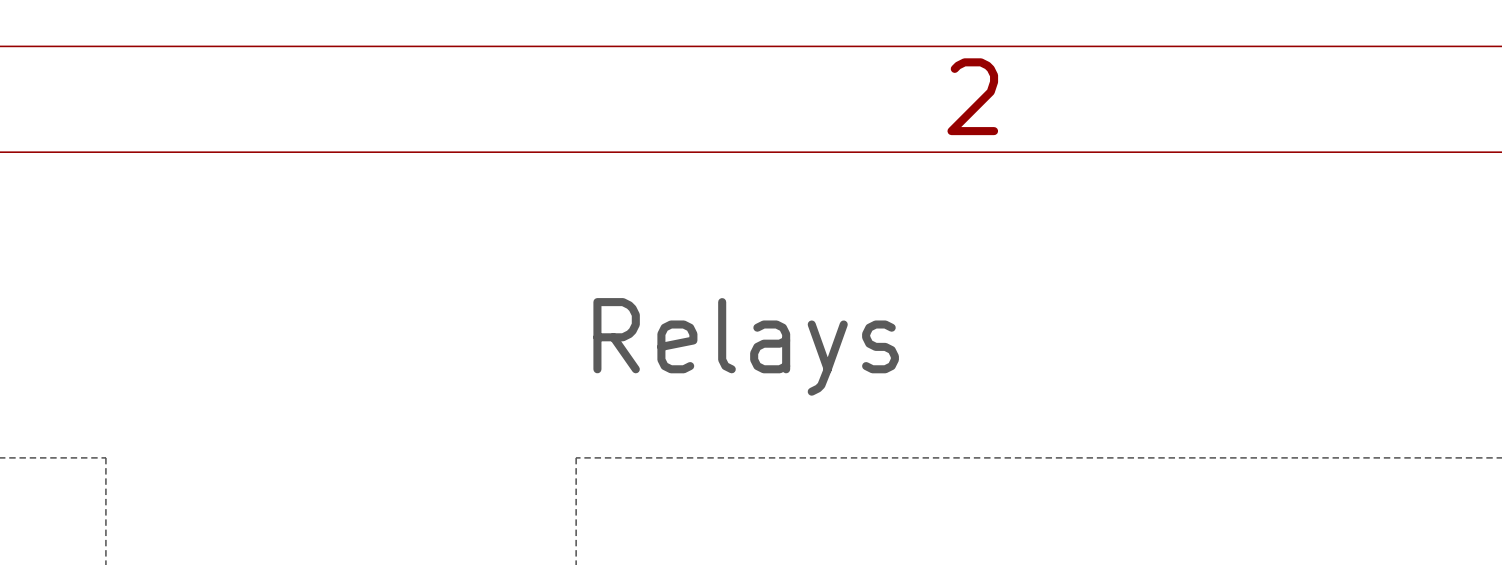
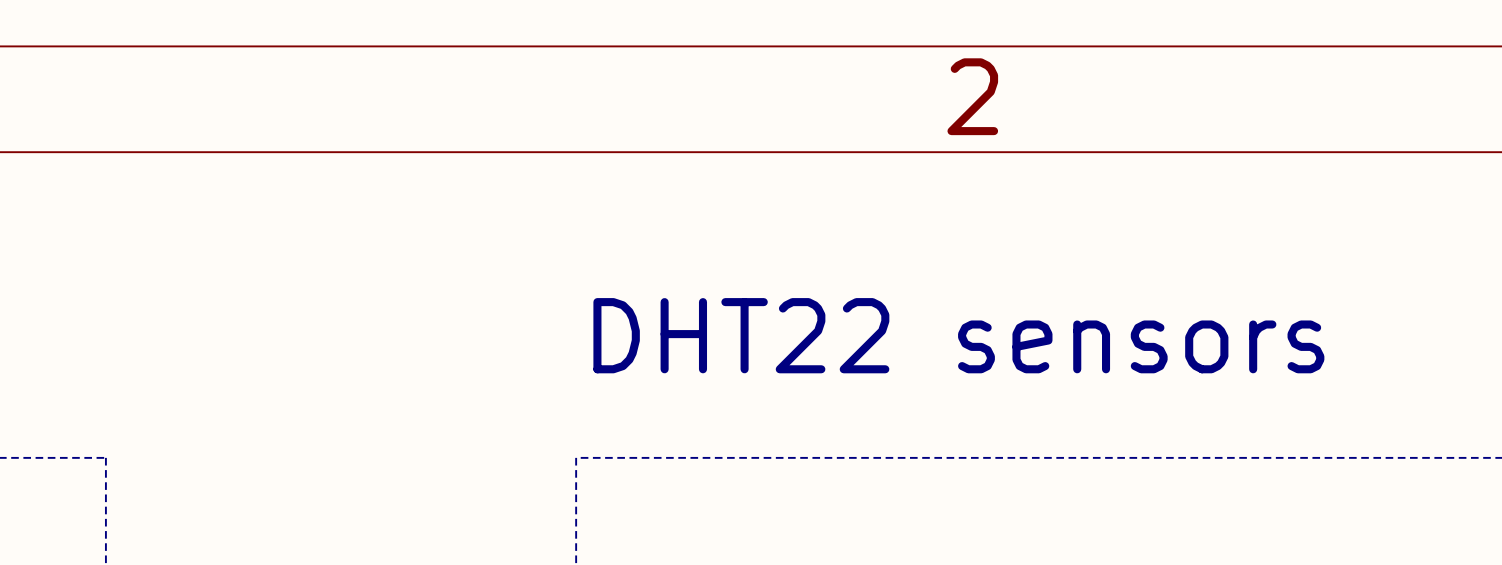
text: Relays (746, 346) -> DHT22 sensors (958, 335)

